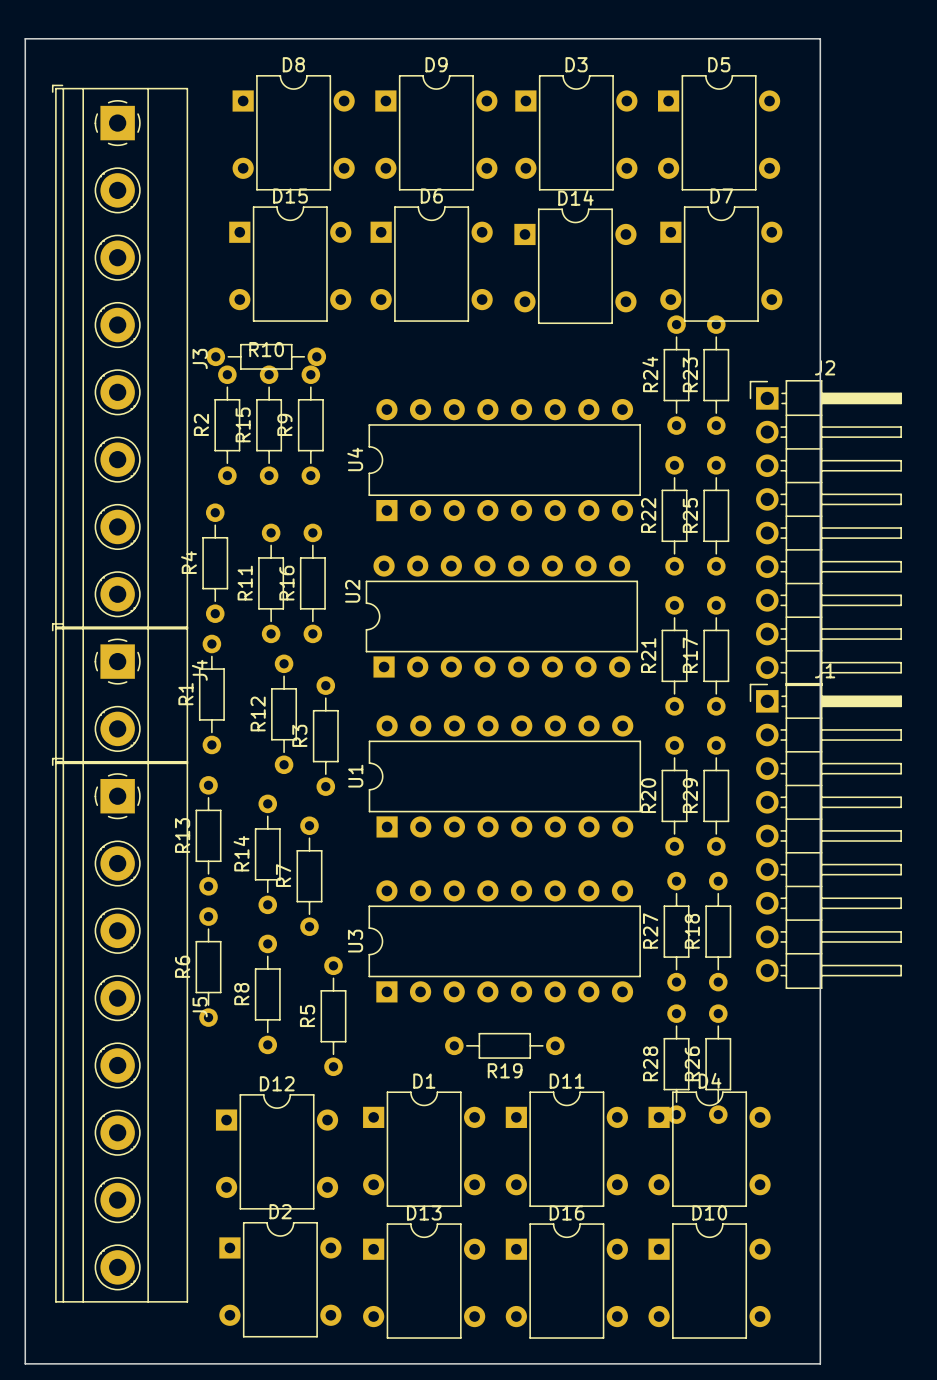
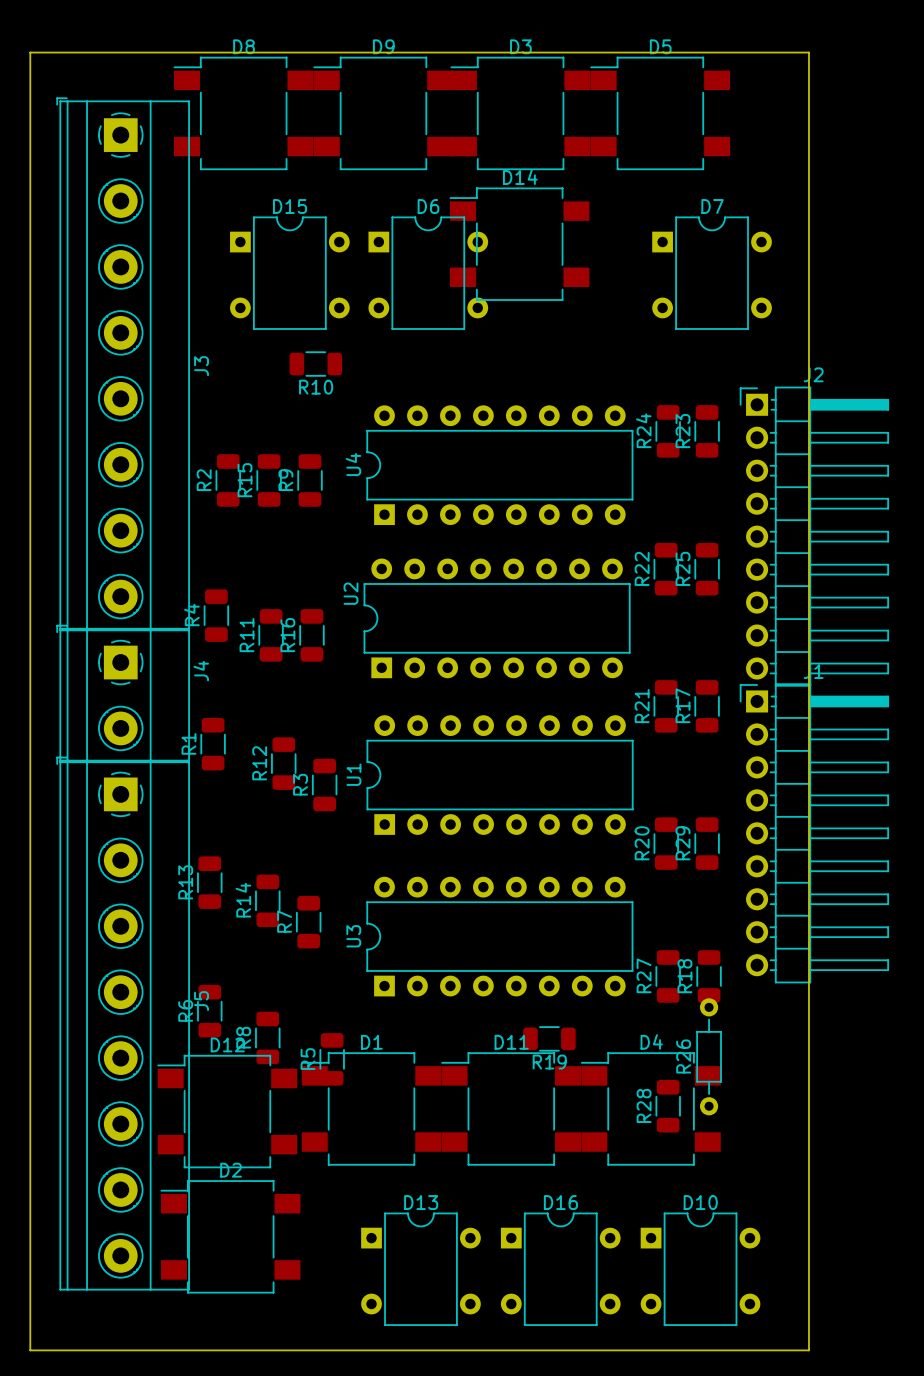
D8 footprint: [232, 75, 355, 191] -> [173, 56, 314, 171]
D9 footprint: [375, 75, 498, 191] -> [313, 56, 454, 171]
D3 footprint: [515, 75, 638, 191] -> [450, 56, 591, 171]
D5 footprint: [657, 75, 781, 191] -> [590, 56, 731, 171]
D14 footprint: [514, 208, 637, 325] -> [449, 187, 590, 301]
R24 footprint: [663, 315, 690, 435] -> [655, 405, 681, 458]
R23 footprint: [703, 315, 730, 435] -> [694, 405, 720, 458]
R10 footprint: [206, 343, 327, 370] -> [289, 351, 343, 377]
R10 name position: R10 (266, 349) -> R10 (316, 387)
R2 footprint: [214, 365, 241, 485] -> [215, 454, 241, 507]
R15 footprint: [256, 365, 283, 485] -> [256, 454, 282, 507]
R9 footprint: [297, 365, 324, 485] -> [297, 454, 323, 507]
R22 footprint: [661, 456, 688, 576] -> [653, 542, 679, 596]
R25 footprint: [703, 456, 730, 576] -> [694, 542, 720, 596]
R4 footprint: [202, 503, 229, 623] -> [203, 589, 229, 642]
R11 footprint: [258, 523, 285, 644] -> [258, 609, 284, 662]
R16 footprint: [299, 523, 326, 644] -> [299, 609, 325, 662]
R21 footprint: [661, 596, 688, 716] -> [653, 680, 679, 733]
R17 footprint: [703, 596, 730, 716] -> [694, 680, 720, 733]
R1 footprint: [198, 634, 225, 755] -> [200, 717, 226, 771]
R12 footprint: [271, 654, 298, 775] -> [271, 737, 297, 790]
R3 footprint: [312, 676, 339, 796] -> [312, 758, 338, 812]
R20 footprint: [661, 736, 688, 856] -> [653, 817, 679, 870]
R29 footprint: [703, 736, 730, 856] -> [694, 817, 720, 870]
R13 footprint: [195, 776, 222, 896] -> [197, 856, 223, 909]
R14 footprint: [254, 794, 281, 915] -> [255, 874, 281, 928]
R7 footprint: [296, 816, 323, 936] -> [296, 895, 322, 949]
R27 footprint: [663, 871, 690, 992] -> [655, 950, 681, 1003]
R18 footprint: [705, 871, 732, 992] -> [696, 950, 722, 1003]
R6 footprint: [195, 907, 222, 1027] -> [197, 984, 223, 1038]
R8 footprint: [254, 934, 281, 1055] -> [255, 1011, 281, 1065]
R5 footprint: [320, 956, 347, 1077] -> [319, 1033, 345, 1086]
R28 footprint: [663, 1004, 690, 1124] -> [655, 1079, 681, 1133]
R19 footprint: [445, 1032, 565, 1059] -> [523, 1026, 576, 1052]
D1 footprint: [363, 1091, 486, 1207] -> [301, 1052, 442, 1166]
D11 footprint: [505, 1091, 628, 1207] -> [441, 1052, 581, 1166]
D4 footprint: [648, 1091, 771, 1207] -> [581, 1052, 721, 1166]
D12 footprint: [215, 1094, 339, 1210] -> [157, 1054, 298, 1169]
D2 footprint: [219, 1221, 342, 1338] -> [160, 1180, 301, 1294]

